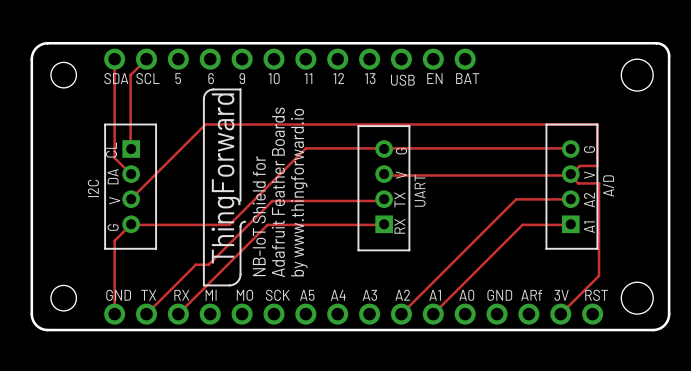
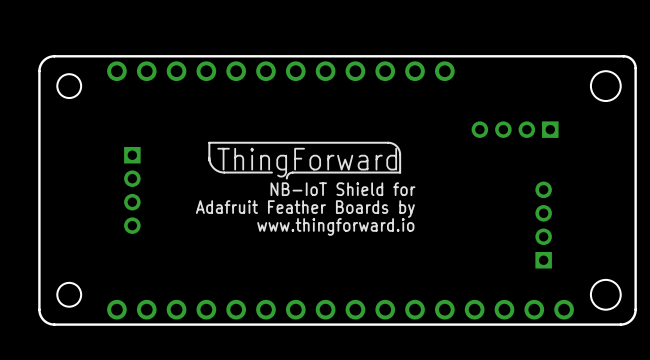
top track: (114, 59) (114, 157) (130, 173) -> none
top track: (146, 59) (130, 75) (130, 148) -> none
text: SDA (116, 78) -> none
text: SCL (147, 78) -> none
text: 5 (178, 78) -> none
text: 6 (211, 78) -> none
text: 9 (242, 78) -> none
text: 10 (274, 78) -> none
text: 11 (308, 78) -> none
text: 12 (338, 78) -> none
text: 13 (370, 78) -> none
text: EN (434, 78) -> none
text: BAT (467, 78) -> none
text: USB (402, 80) -> none
part: none -> (515, 129)
line: (156, 124) (105, 124) (105, 248) (156, 248) (156, 124) -> none
line: (597, 124) (546, 124) (546, 248) (597, 248) (597, 124) -> none
line: (409, 126) (358, 126) (358, 250) (409, 250) (409, 126) -> none
top track: (570, 148) (305, 148) (229, 224) (130, 224) (114, 240) (114, 314) -> none
text: G (589, 149) -> none
text: CL (111, 150) -> none
line: none -> (209, 157) (212, 166) (220, 172) (271, 172)
text: G (401, 151) -> none
line: none -> (209, 160) (209, 142) (388, 142) (395, 145) (399, 151) (400, 172) (292, 172) (288, 174) (286, 178)
text: V (401, 175) -> none
top track: (570, 175) (578, 183) (599, 183) (599, 275) (560, 314) -> none
top track: (570, 175) (383, 175) -> none
top track: (570, 175) (579, 165) (597, 165) (597, 124) (205, 124) (130, 199) -> none
text: V (589, 175) -> none
text: DA (113, 176) -> none
text rotation: 0° (226, 178) -> 90° clockwise (307, 162)
part: (384, 186) -> none
part: (570, 186) -> none
text: A/D (608, 186) -> none
text: I2C (93, 188) -> none
text: UART (420, 190) -> none
text: Adafruit Feather Boards (278, 192) -> Adafruit Feather Boards by (305, 209)
text: by www.thingforward.io (299, 192) -> www.thingforward.io (335, 226)
top track: (383, 199) (382, 200) (272, 200) (208, 264) (195, 264) (146, 314) -> none
text: TX (399, 199) -> none
top track: (570, 199) (516, 199) (401, 314) -> none
text: V (114, 200) -> none
line: (240, 200) (240, 89) (210, 89) (205, 93) (203, 99) (203, 285) (230, 285) (239, 279) (240, 225) (245, 221) -> none
text: A2 (589, 200) -> none
text rotation: 0° (259, 216) -> 90° clockwise (342, 189)
part: none -> (543, 225)
top track: (385, 224) (267, 224) (178, 314) -> none
top track: (571, 224) (522, 224) (433, 314) -> none
text: RX (399, 226) -> none
text: G (113, 227) -> none
text: A1 (589, 227) -> none
text: GND (118, 295) -> none
text: TX (148, 295) -> none
text: RX (181, 295) -> none
text: MI (211, 295) -> none
text: MO (244, 295) -> none
text: SCK (277, 295) -> none
text: A5 (307, 295) -> none
text: A4 (338, 295) -> none
text: A3 (369, 295) -> none
text: A2 (402, 295) -> none
text: A1 (435, 295) -> none
text: A0 (466, 295) -> none
text: GND (499, 295) -> none
text: ARf (531, 295) -> none
text: 3V (561, 295) -> none
text: RST (596, 295) -> none

